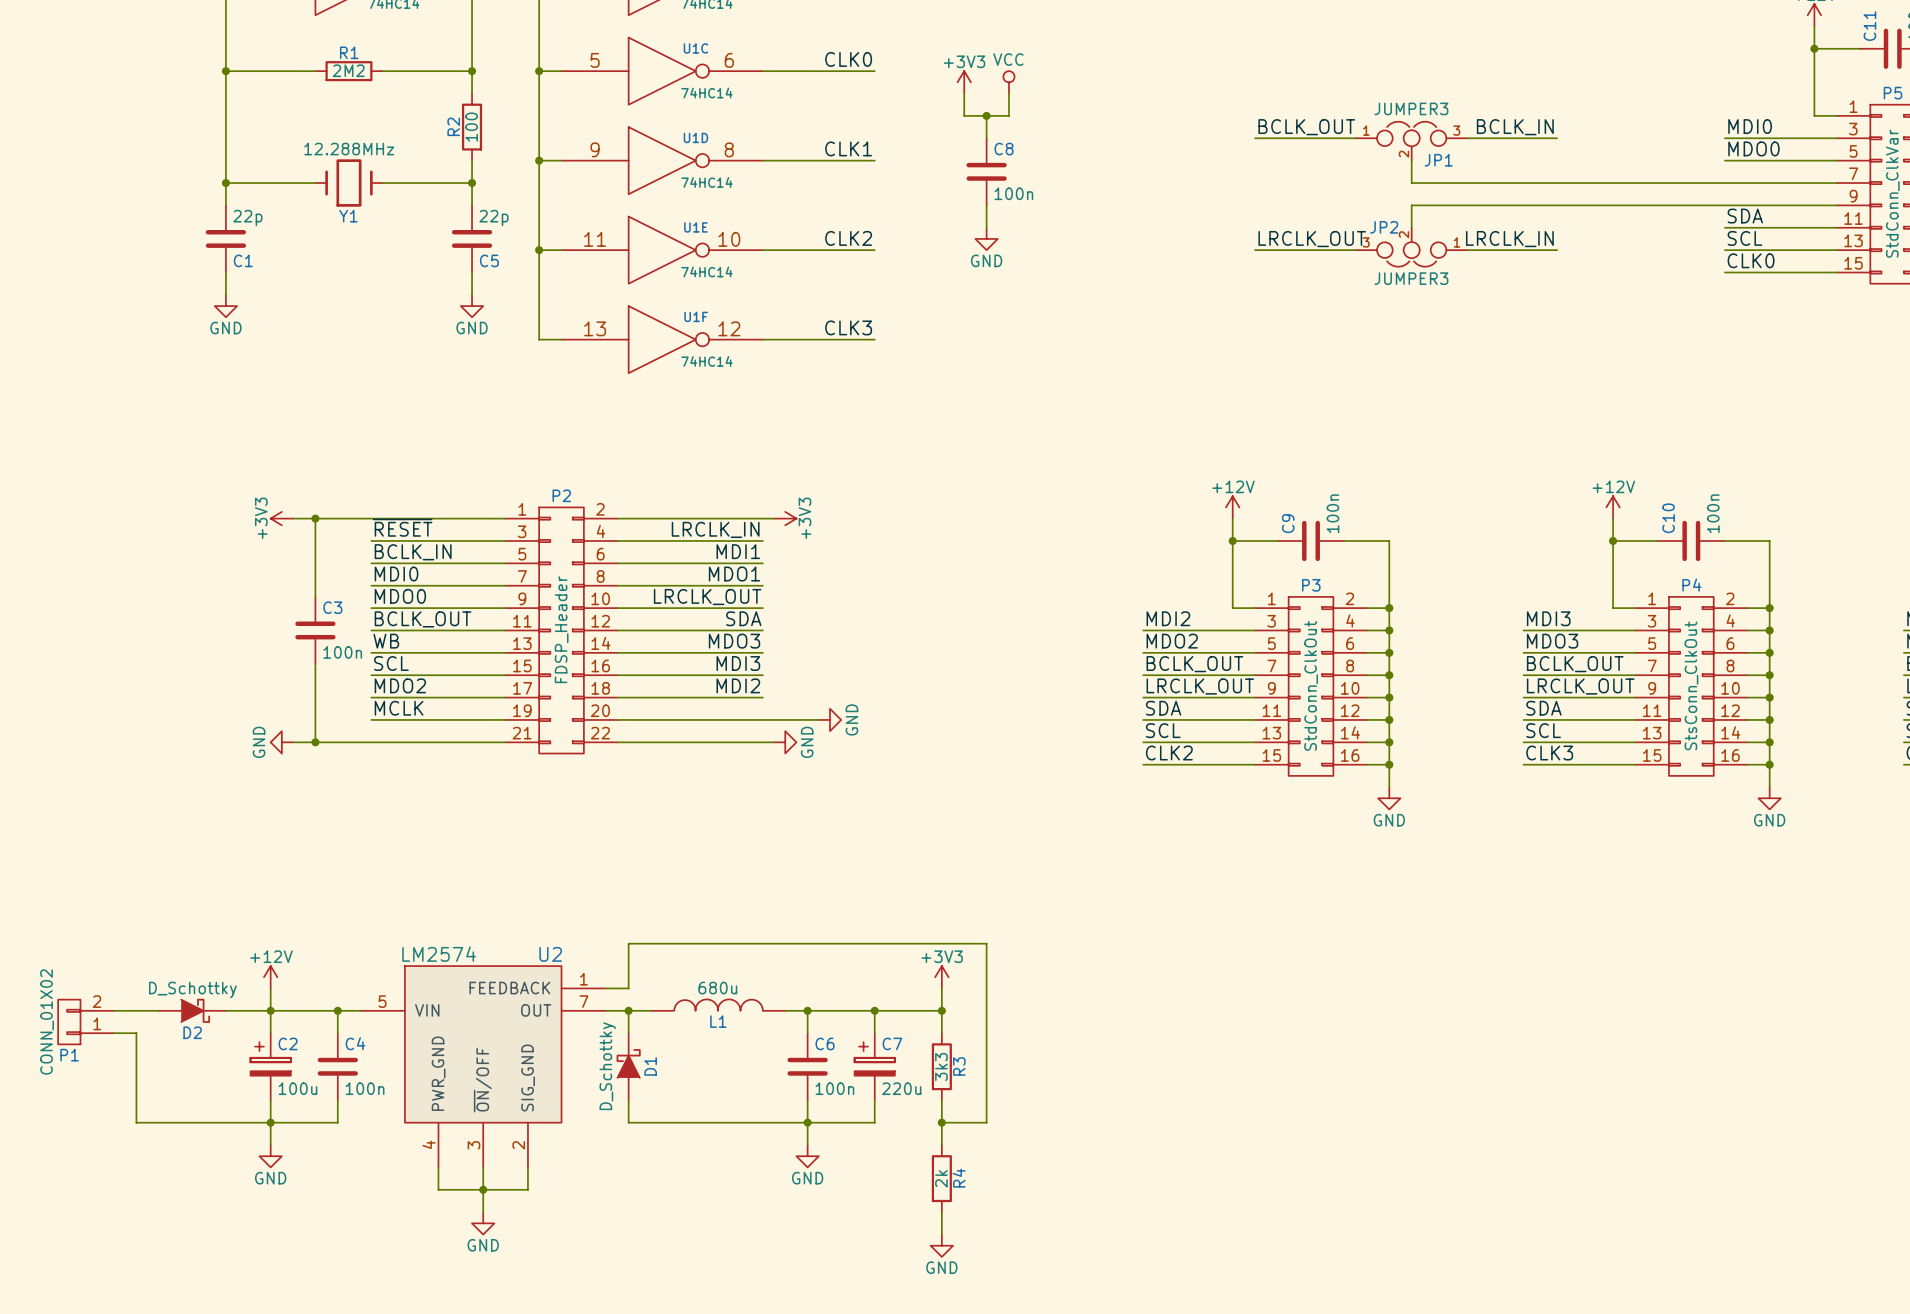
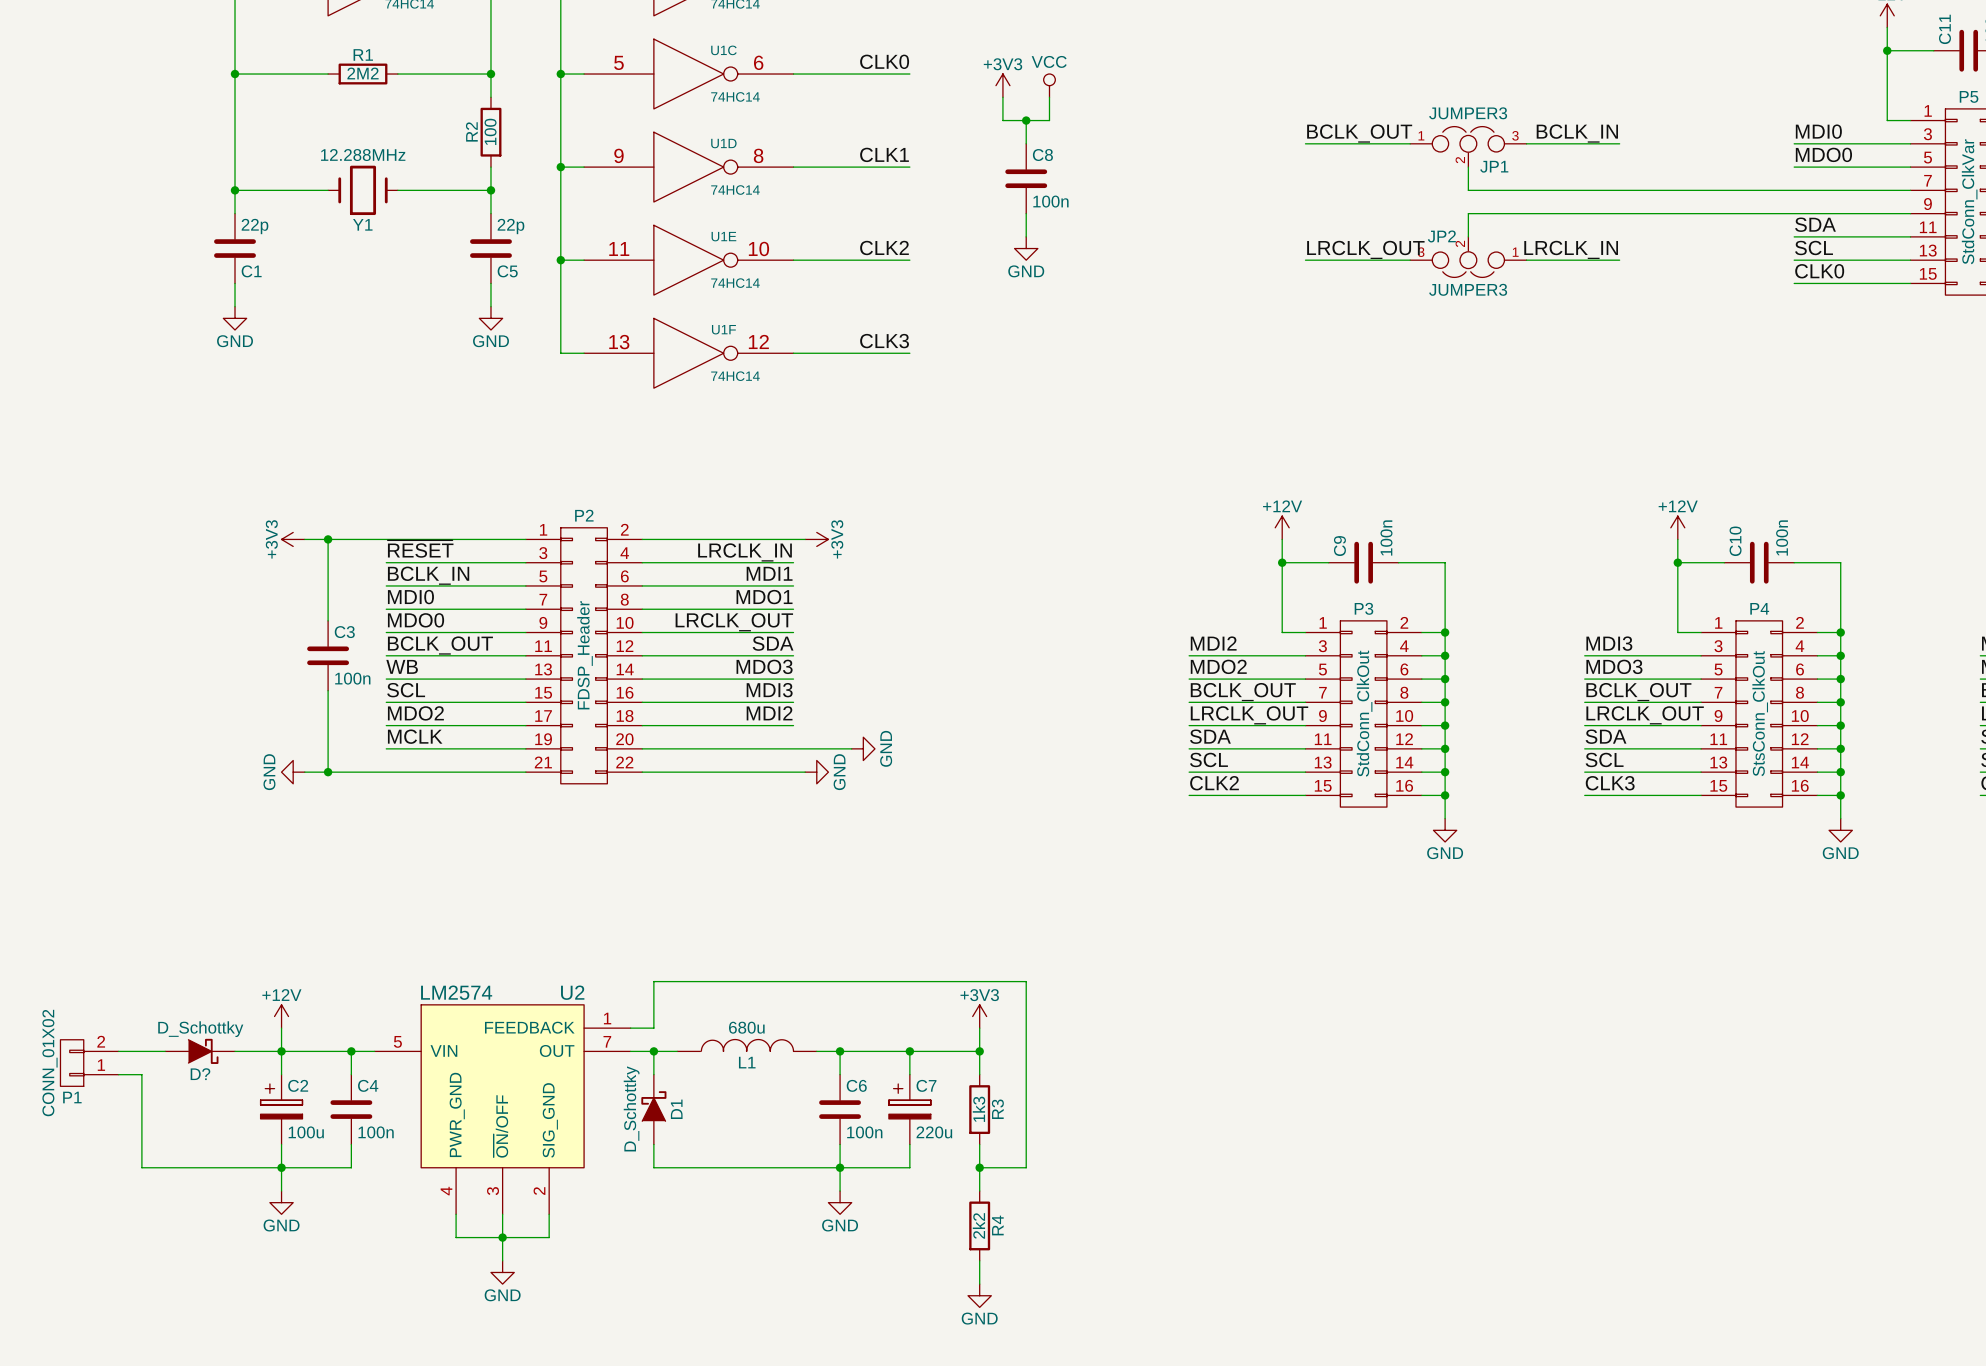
D2 name: D2 (192, 1032) -> D? (200, 1074)
R3 value: 3k3 (941, 1067) -> 1k3 (979, 1109)
R4 value: 2k (941, 1178) -> 2k2 (978, 1225)

